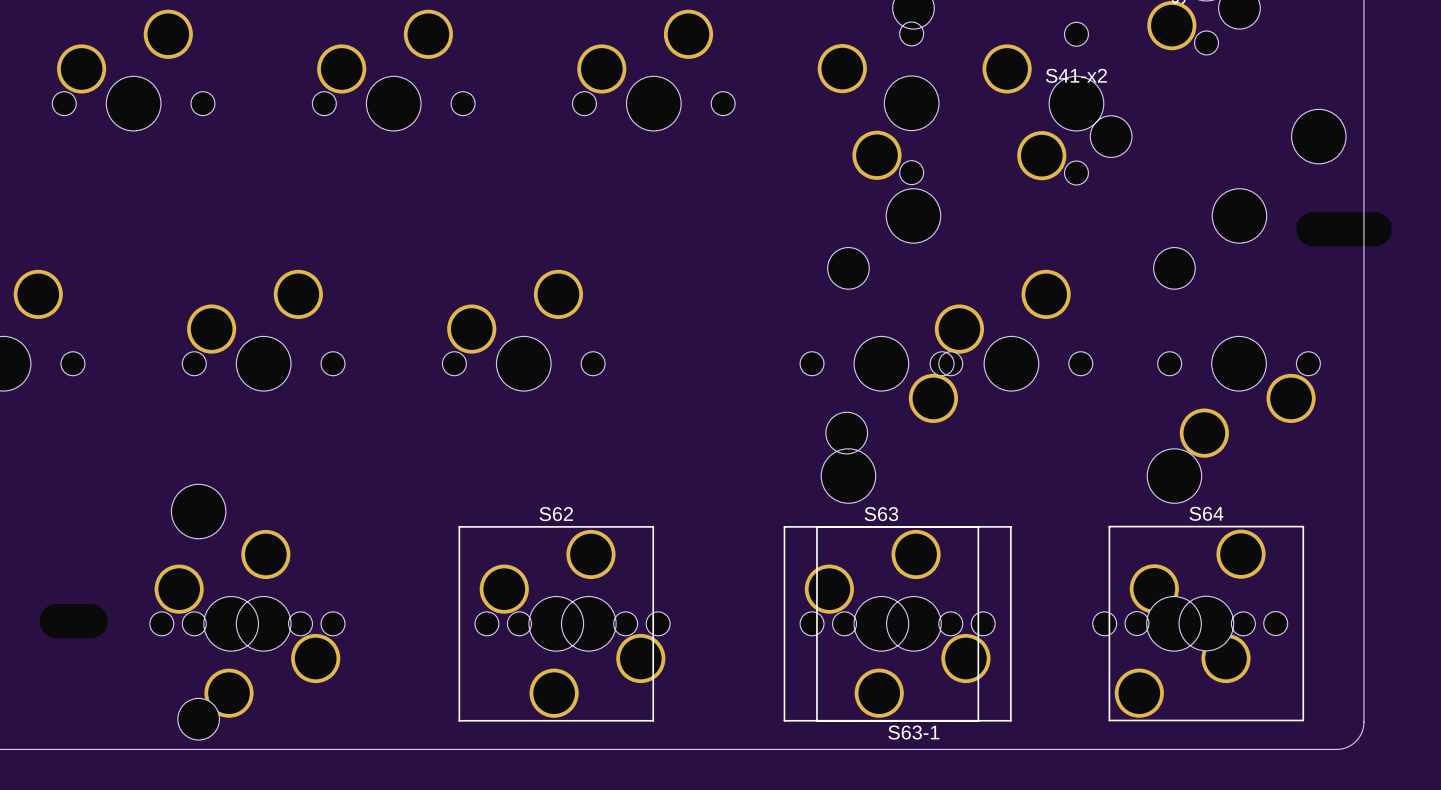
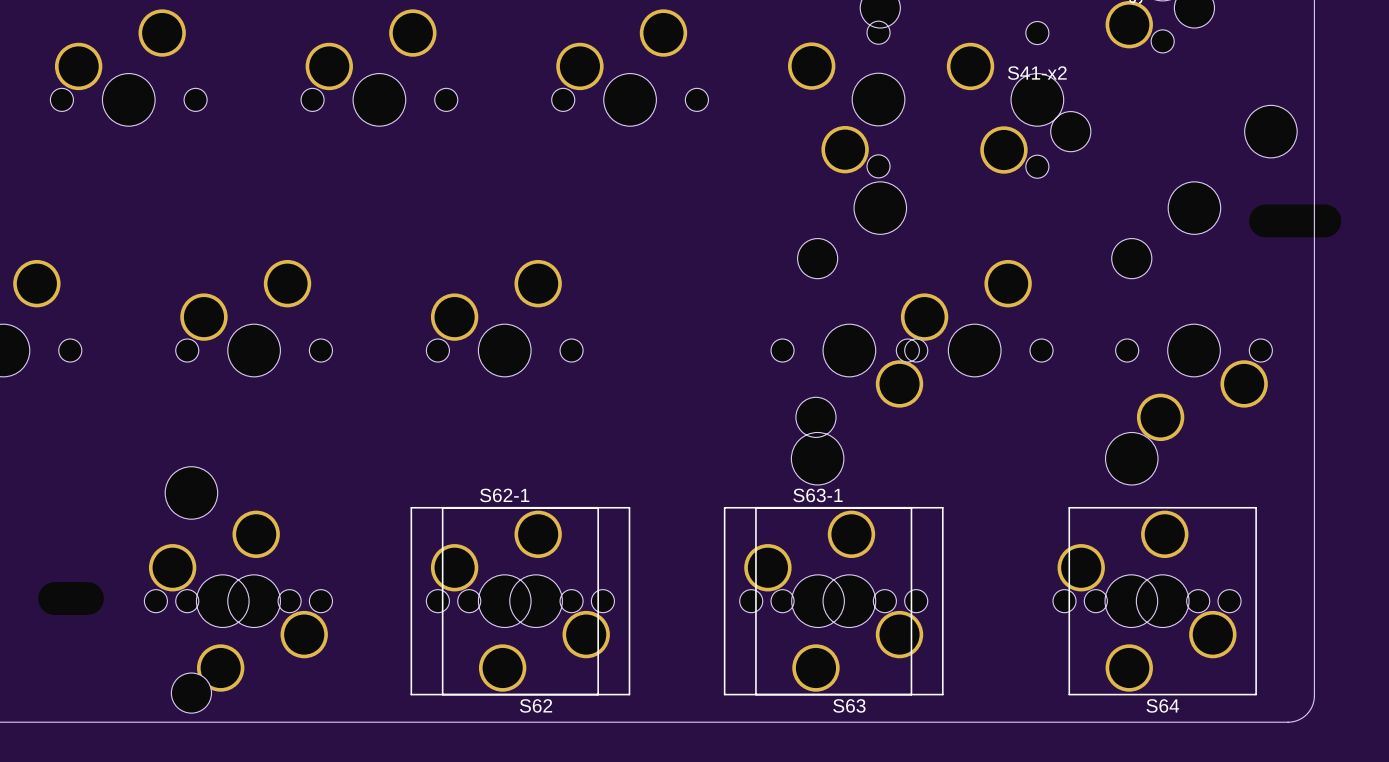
S62-1: none -> (504, 601)
S62 rotation: 0° (556, 623) -> 180° (536, 601)
S63 rotation: 0° (881, 623) -> 180° (849, 601)
S63-1 rotation: 0° (913, 623) -> 180° (818, 601)
S64 rotation: 0° (1206, 623) -> 180° (1162, 601)
part: (588, 657) -> none
part rotation: 0° (1174, 657) -> 180° (1131, 569)

